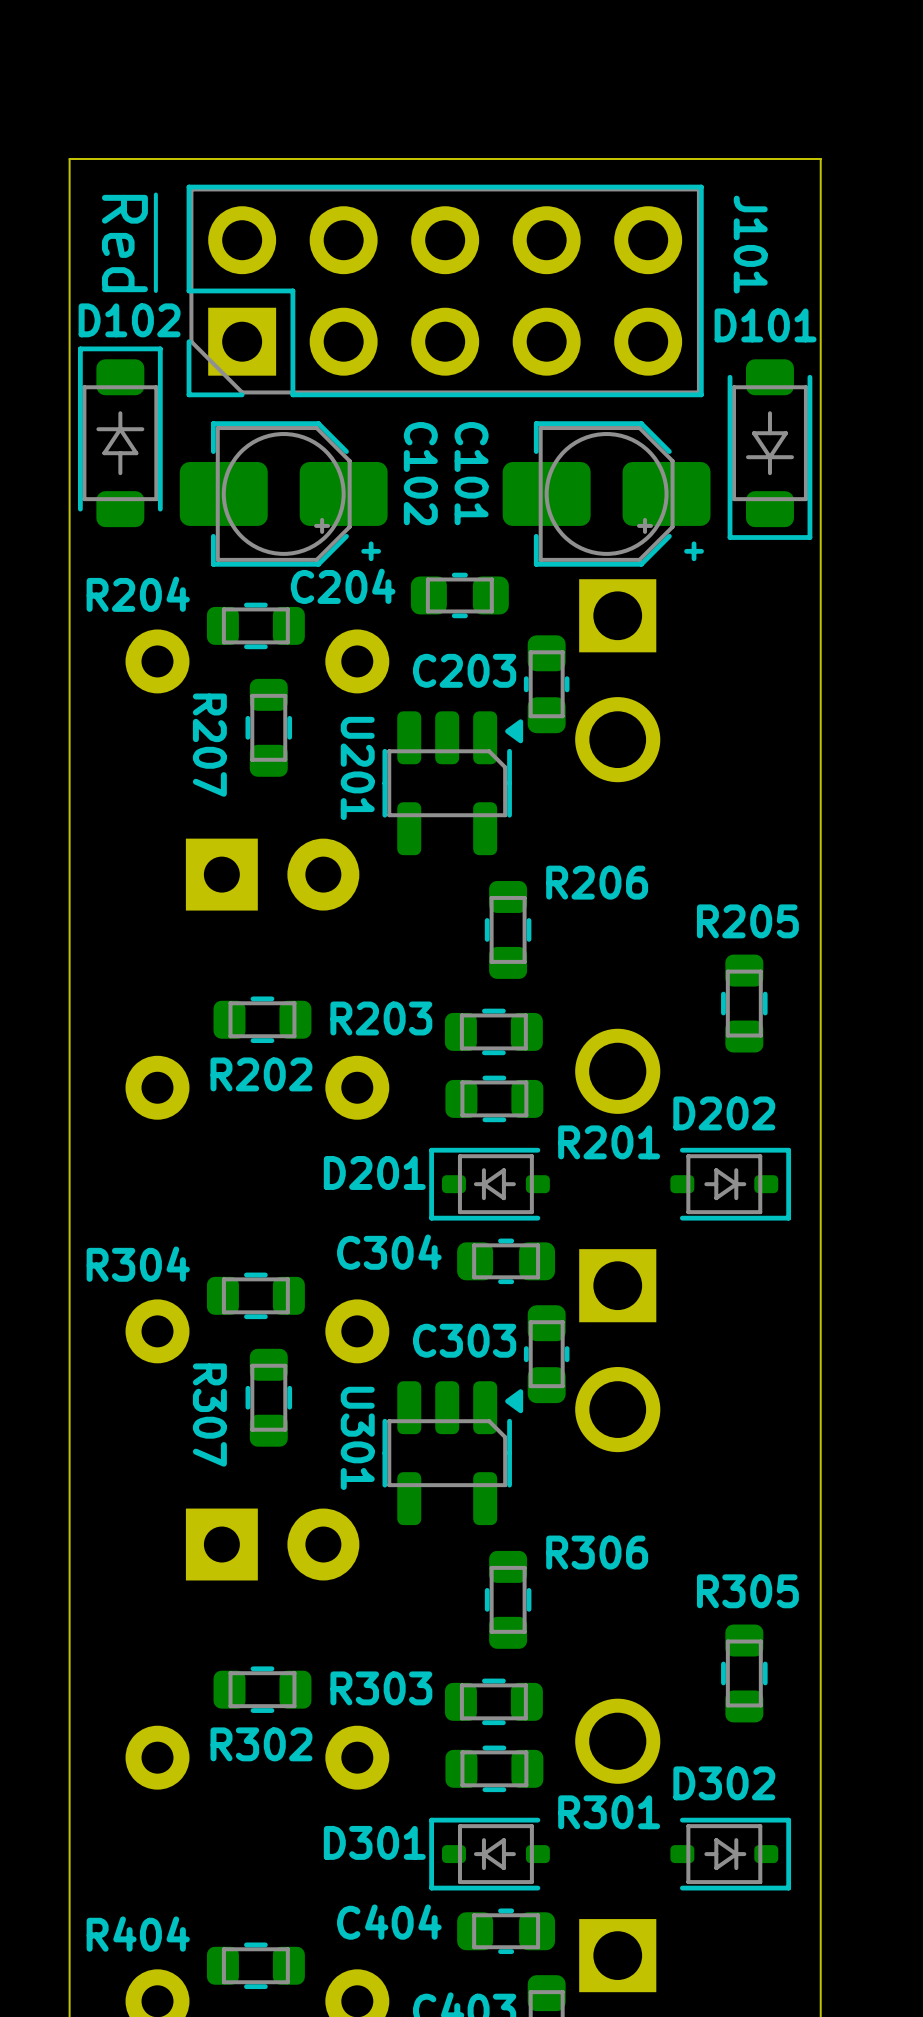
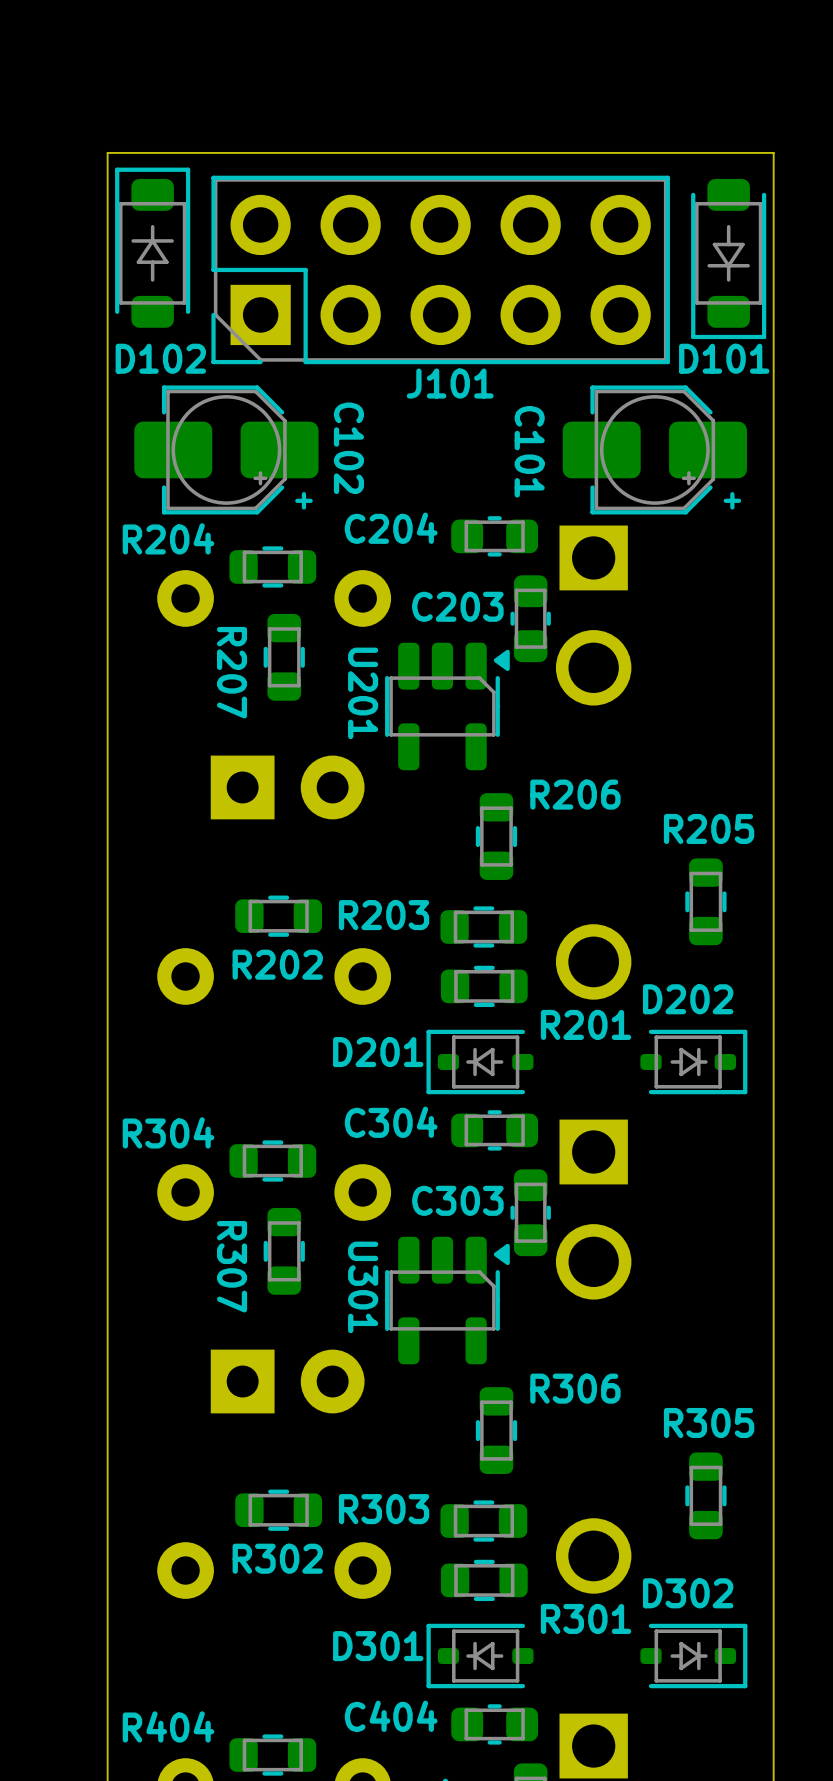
line: (155, 194) (155, 290) -> none
text: Red (124, 243) -> none
J101 name rotation: 0° (750, 244) -> 90° counterclockwise (450, 383)
J101 name position: J101 (750, 244) -> J101 (450, 383)
D102 name position: D102 (129, 320) -> D102 (160, 358)
D101 name position: D101 (765, 325) -> D101 (724, 358)
D102 position: (120, 436) -> (152, 247)
D101 position: (769, 449) -> (728, 259)
C102 name position: C102 (420, 473) -> C102 (348, 448)
C101 name position: C101 (471, 473) -> C101 (529, 451)
C102 position: (283, 493) -> (226, 449)
C101 position: (606, 493) -> (654, 449)
C204 position: (459, 595) -> (494, 536)

